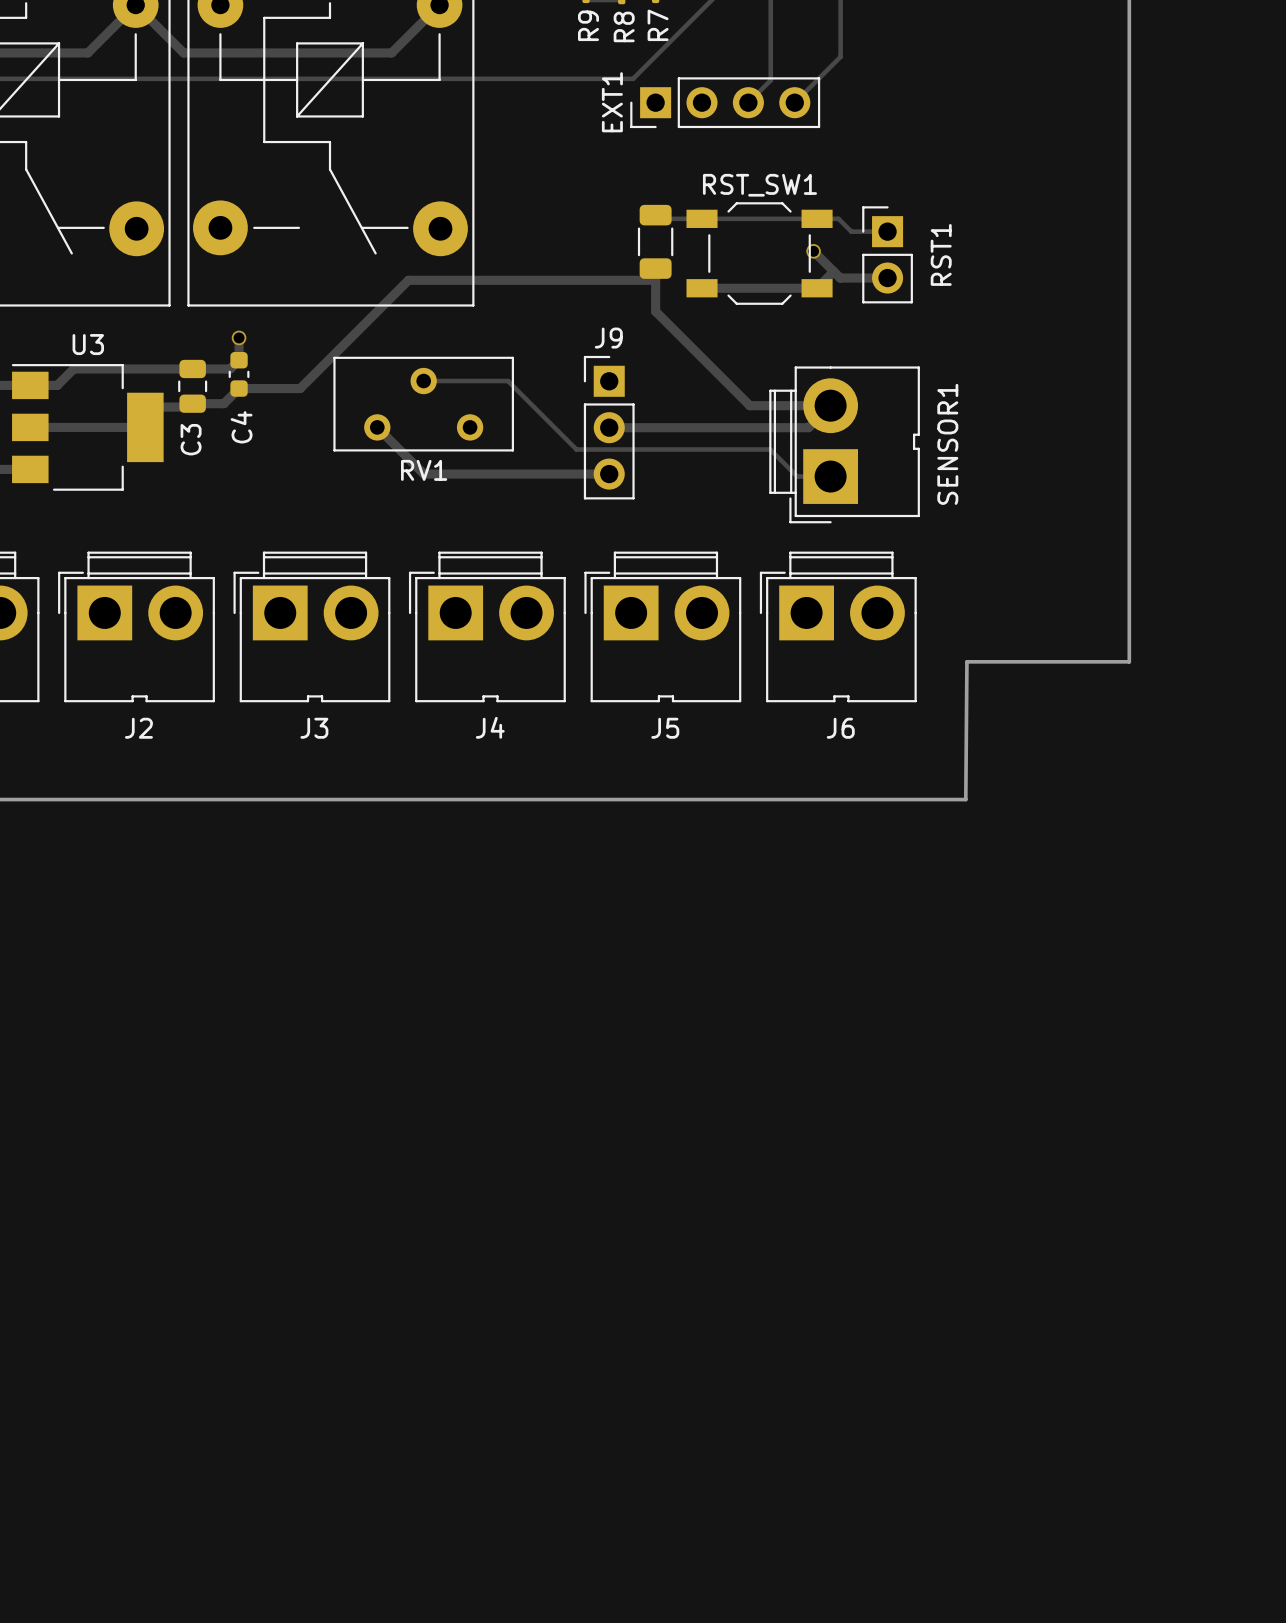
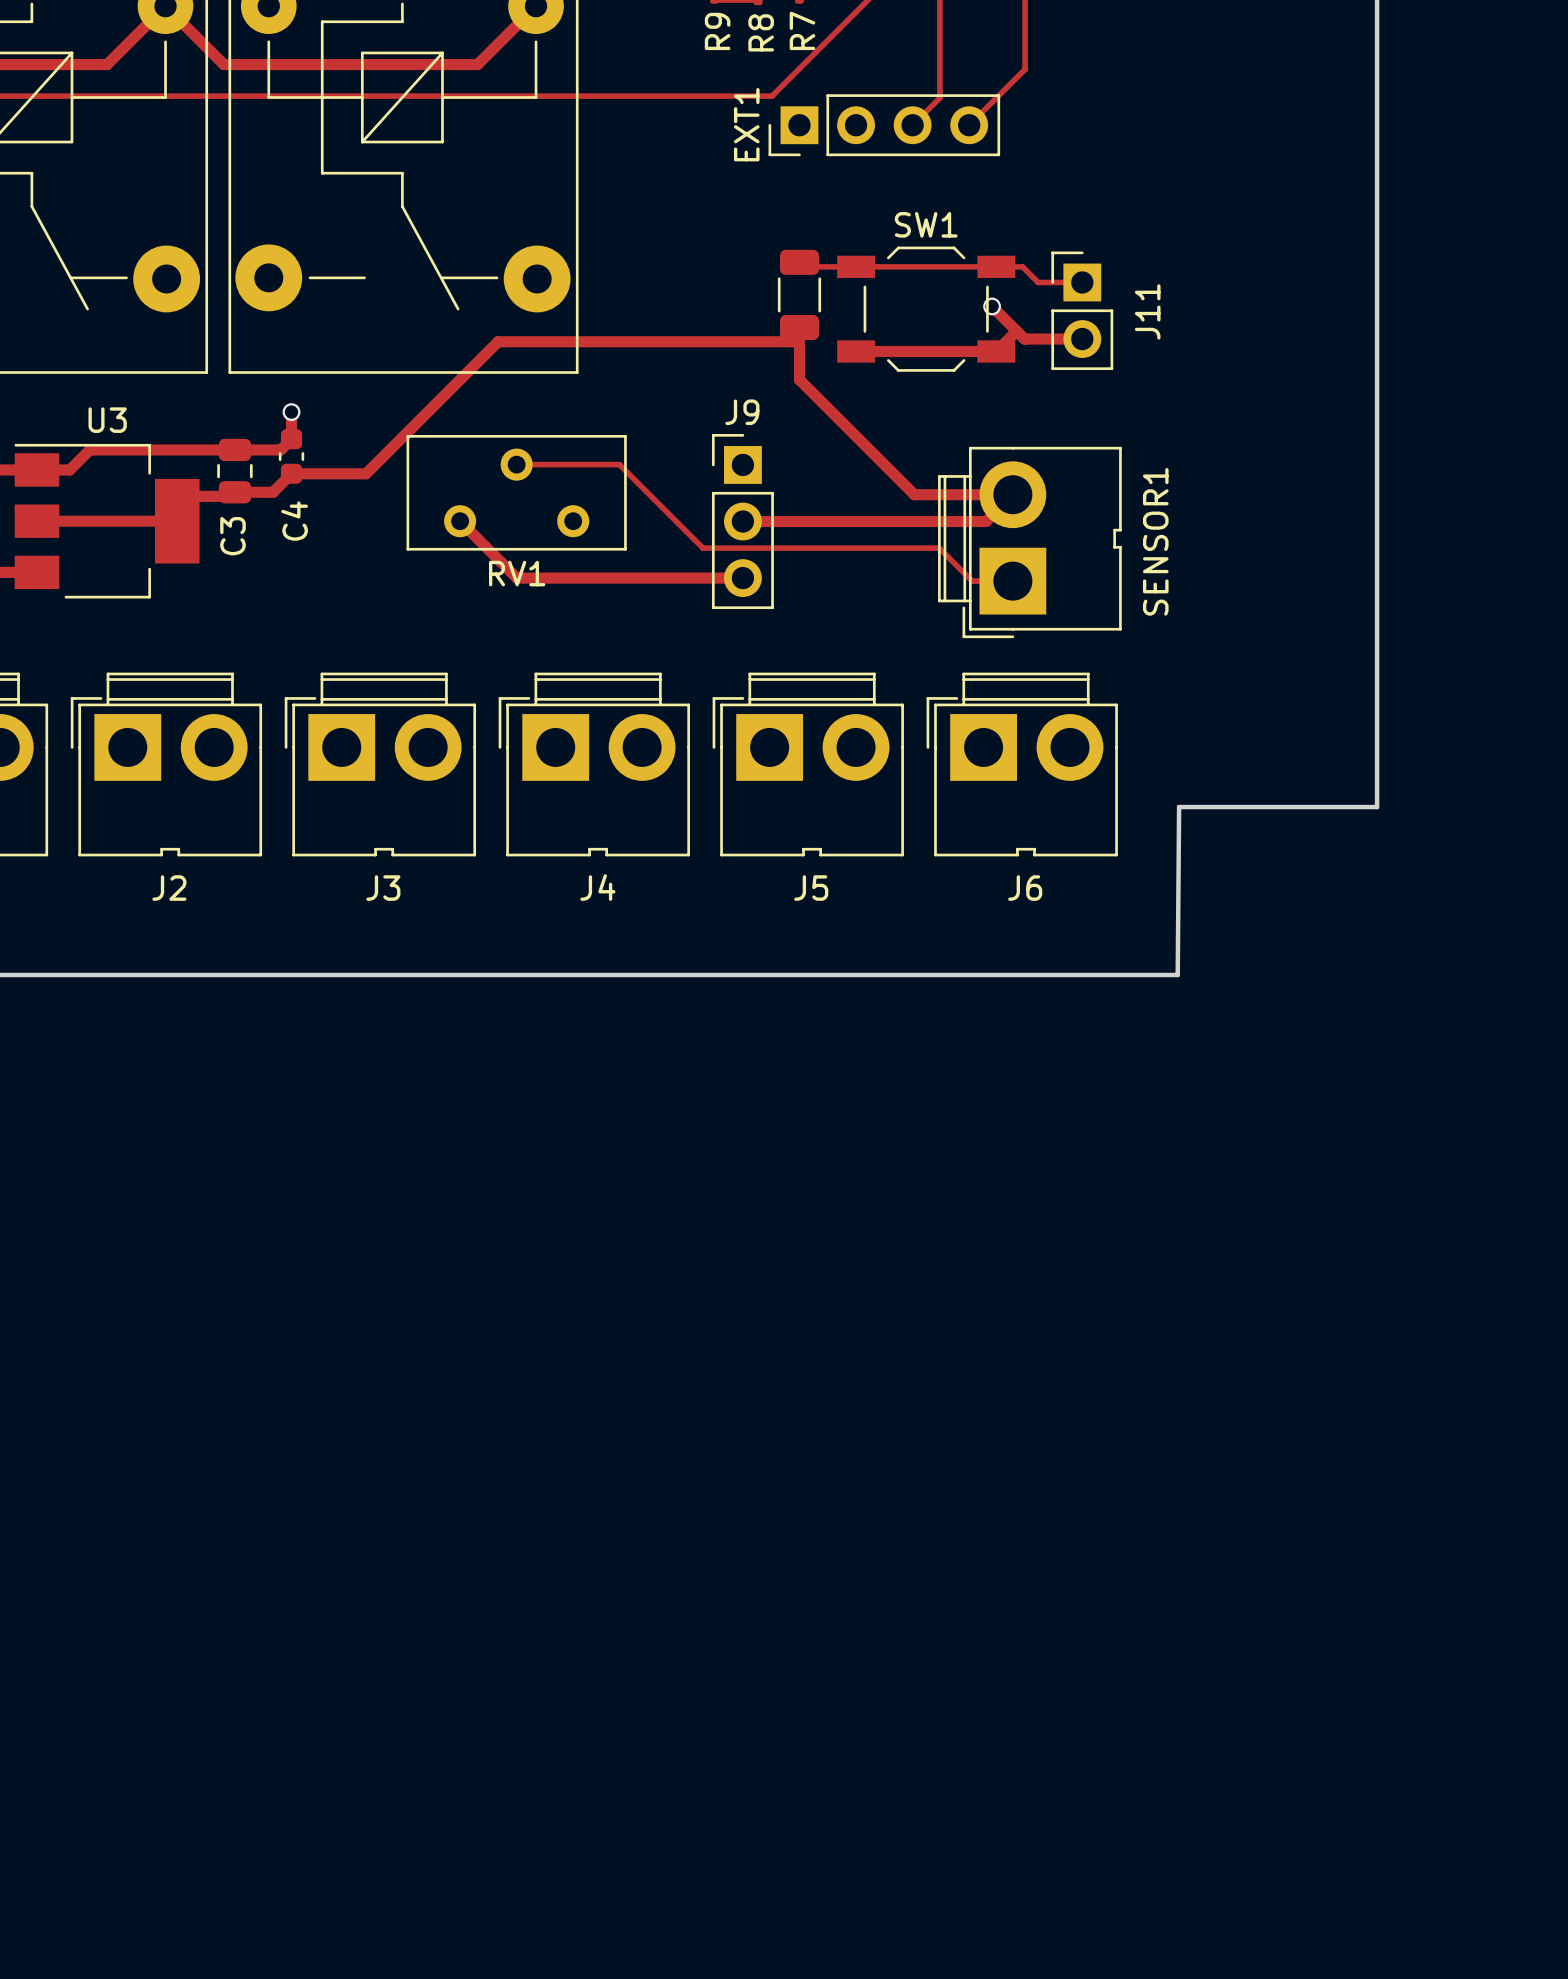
RST_SW1 name: RST_SW1 (759, 185) -> SW1 (926, 224)
RST1 name: RST1 (941, 254) -> J11 (1147, 311)

